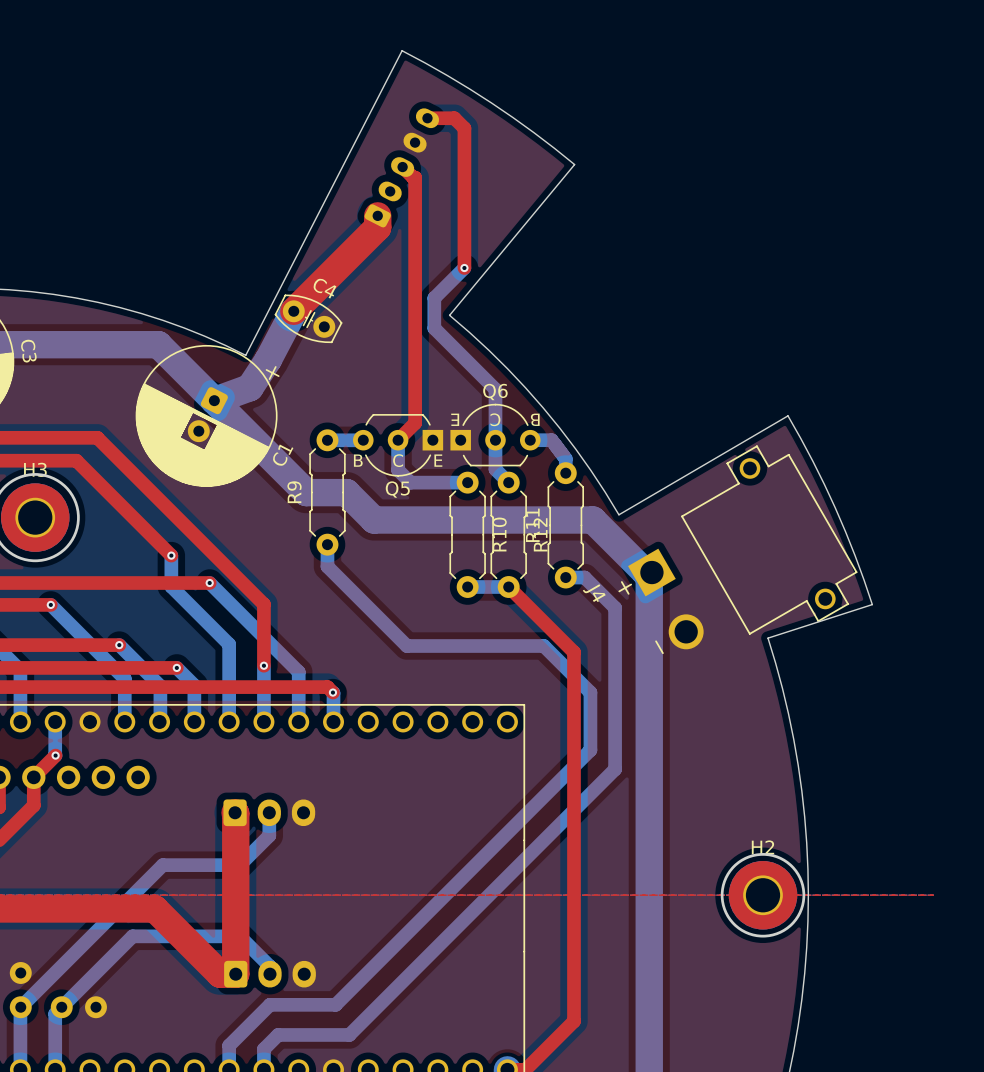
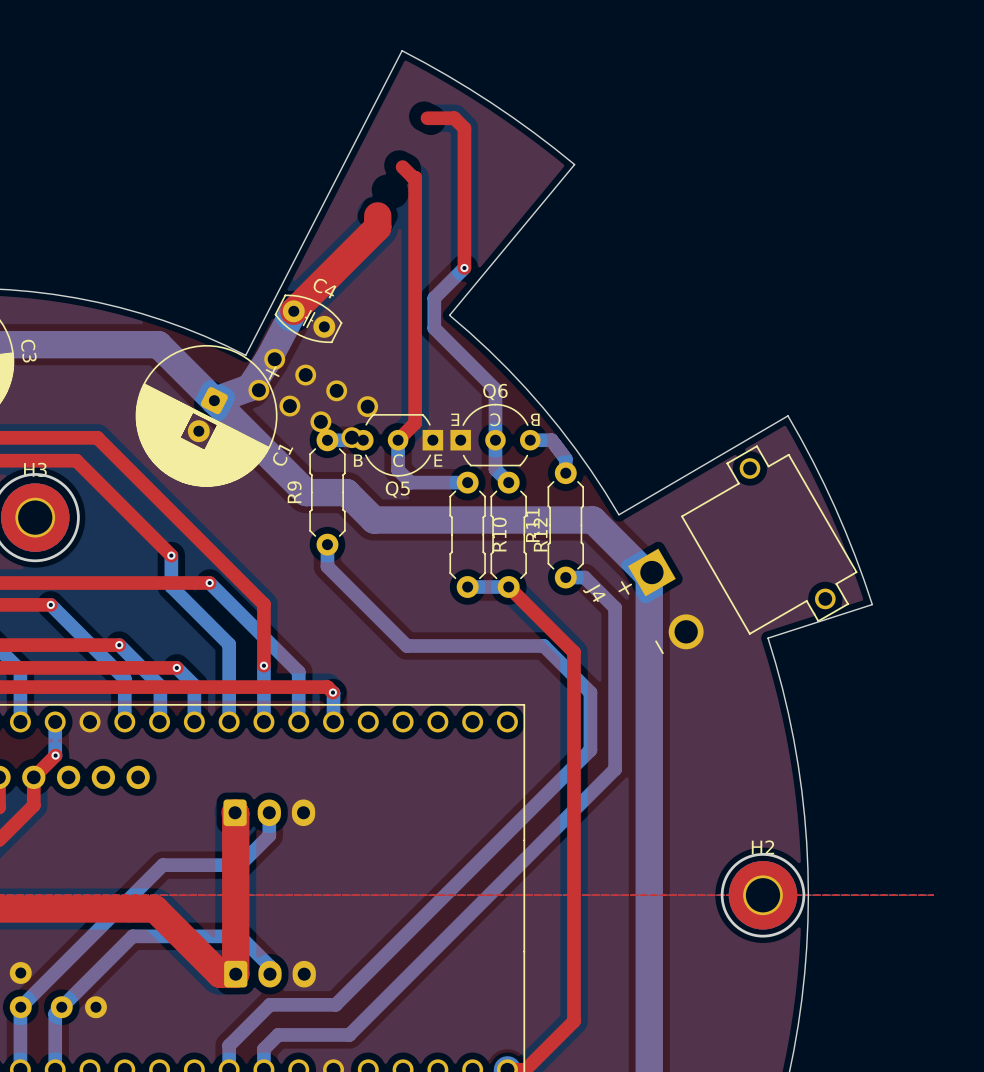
part: (401, 167) -> none
part: none -> (313, 398)

